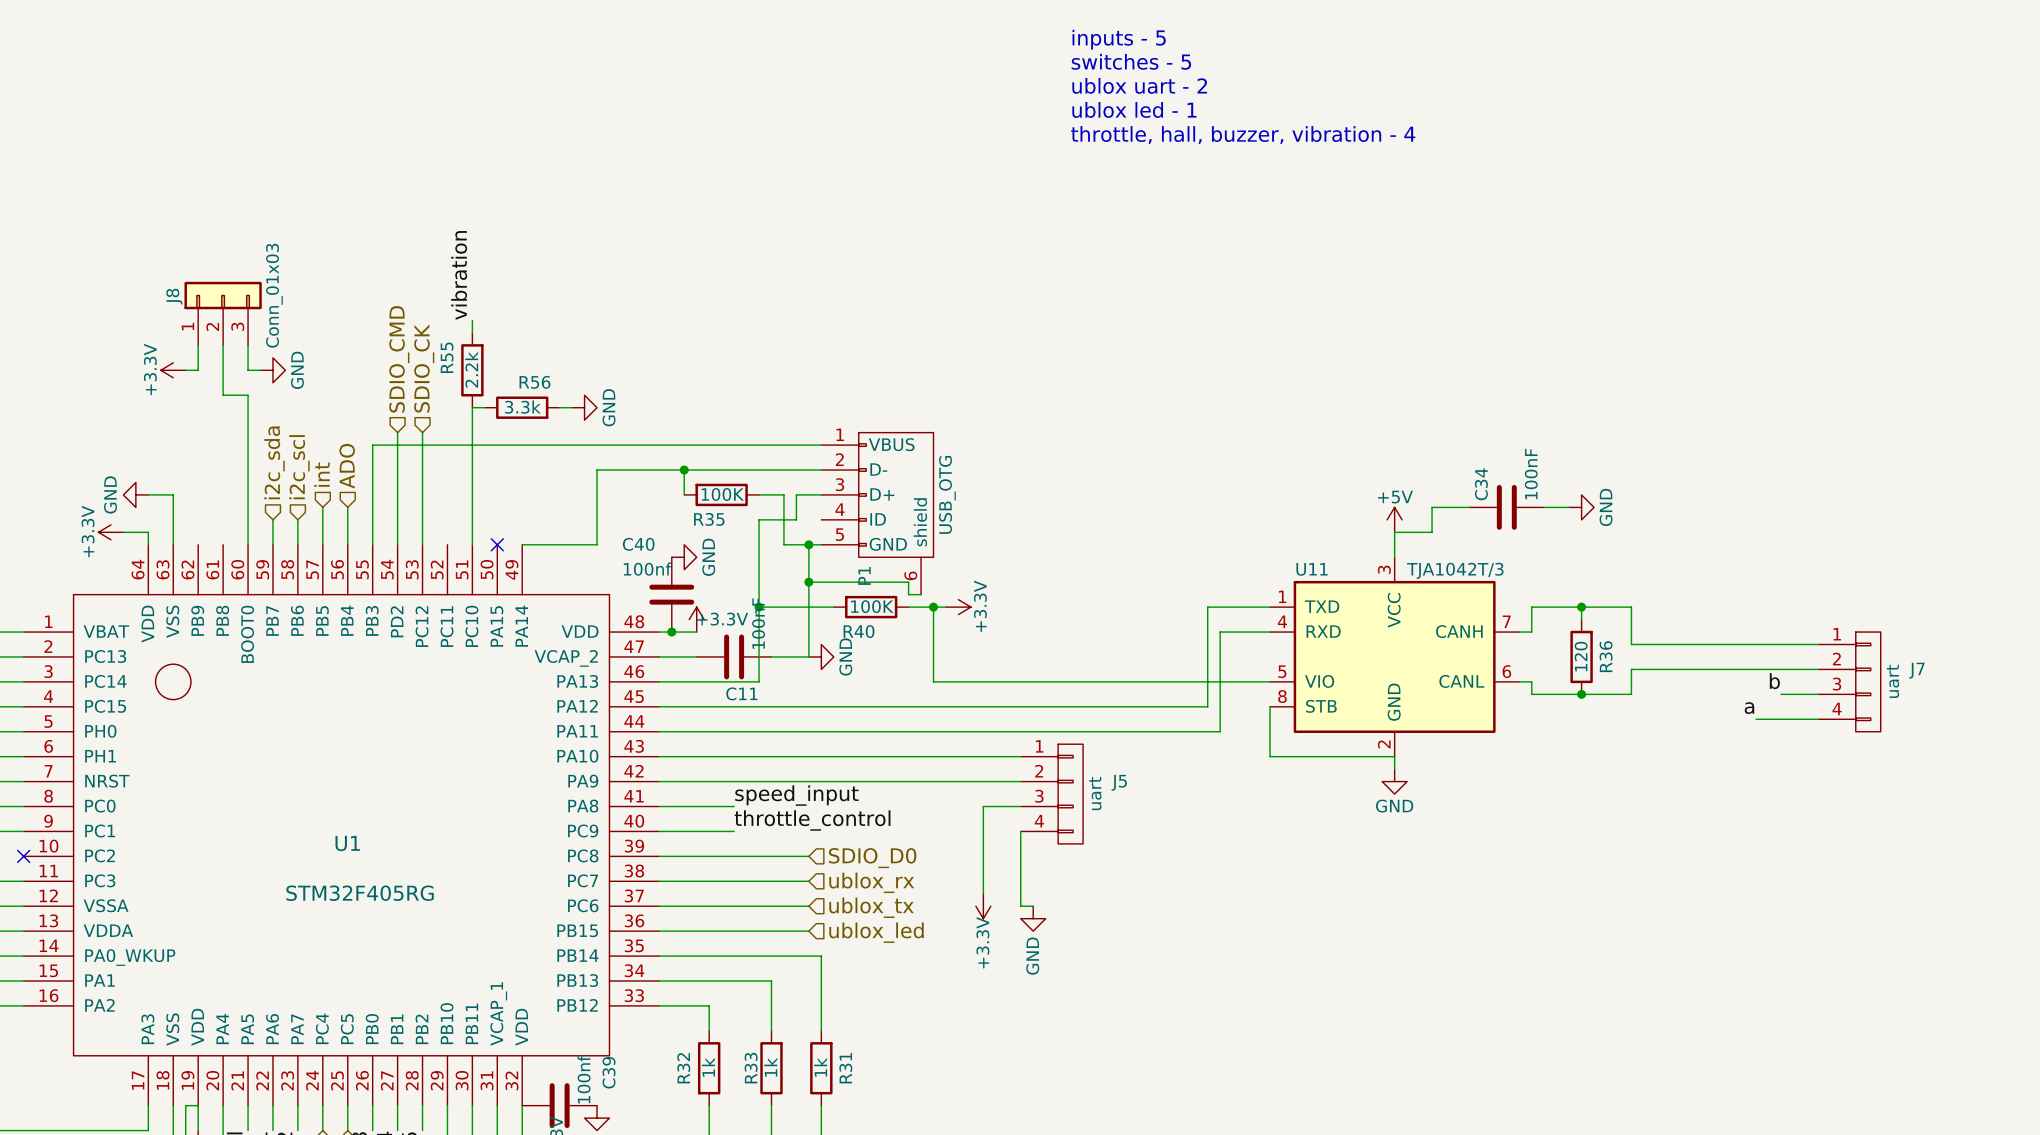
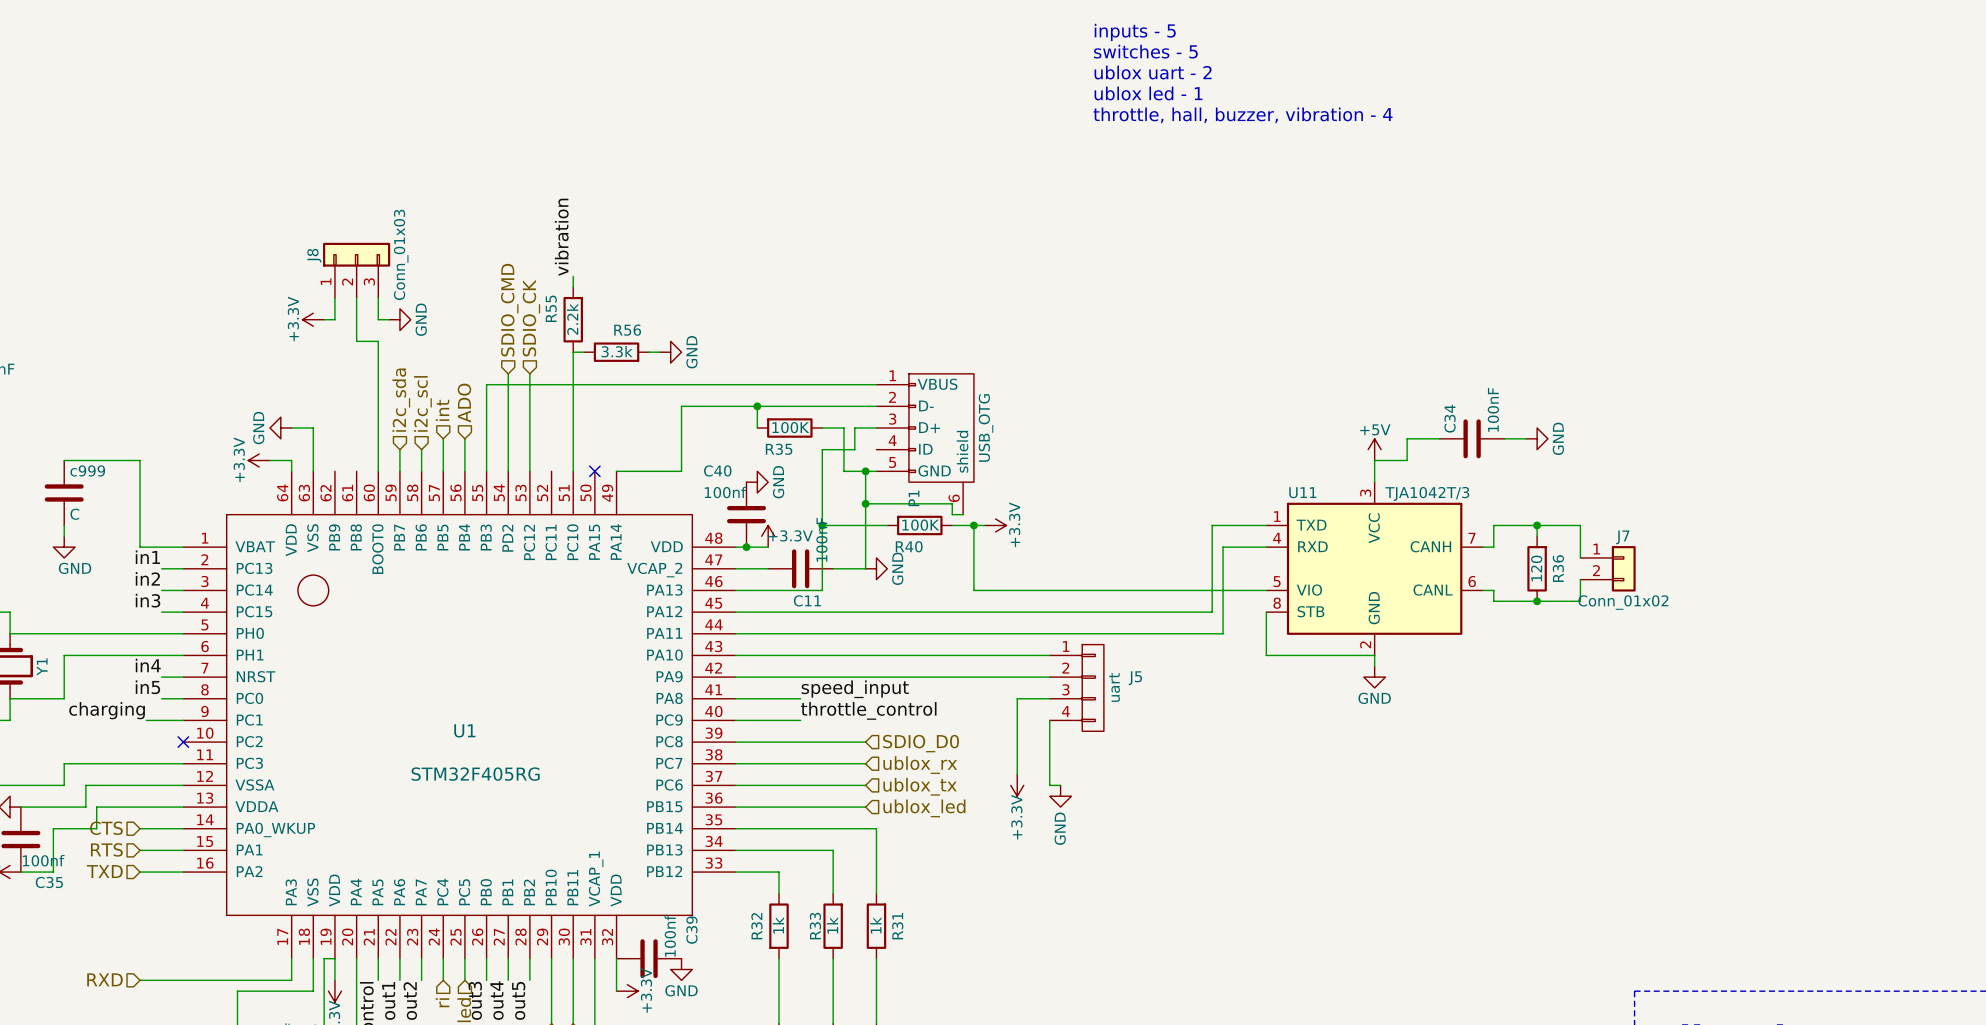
J7 symbol: [1818, 632, 1881, 732] -> [1580, 546, 1636, 592]
wire: (1631, 644) (1818, 644) -> none
wire: (1631, 669) (1818, 669) -> none
J7 name position: J7 (1916, 670) -> J7 (1622, 537)
label: b (1774, 681) -> none
J7 value: uart (1893, 681) -> Conn_01x02 (1623, 602)
wire: (1781, 694) (1818, 694) -> none
label: a (1749, 708) -> none
wire: (1756, 719) (1818, 719) -> none

